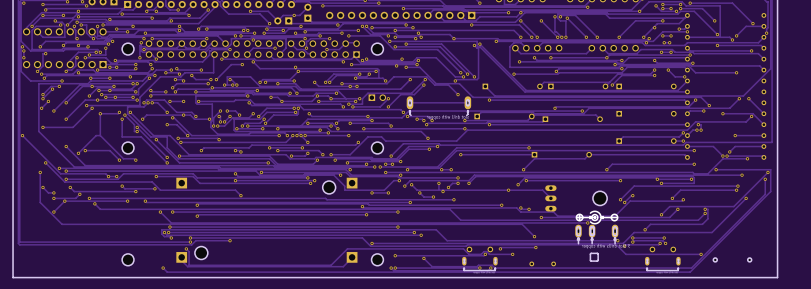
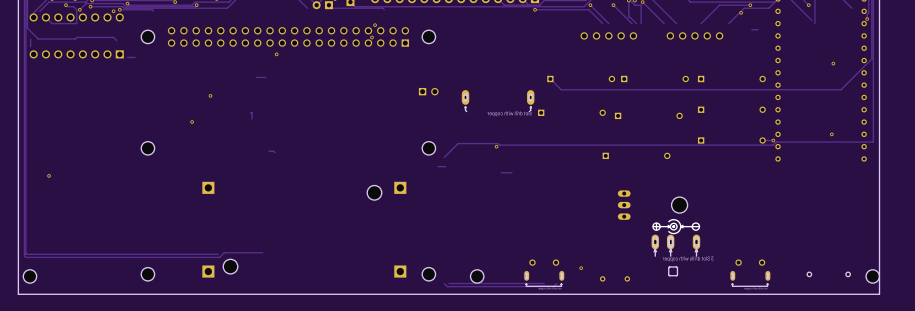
via: (269, 23) -> none
via: (752, 23) -> none
track: (60, 25) (36, 26) (32, 30) (32, 49) (88, 46) -> none
via: (60, 25) -> none
track: (81, 25) (86, 25) (86, 33) (93, 38) -> none
via: (81, 25) -> none
via: (337, 25) -> none
track: (406, 25) (343, 23) (337, 29) (288, 29) (284, 33) (264, 33) -> none
via: (406, 25) -> none
via: (32, 26) -> none
track: (74, 26) (77, 38) -> none
via: (74, 26) -> none
track: (97, 26) (97, 35) (101, 37) (107, 37) (109, 34) (134, 34) (138, 30) (175, 30) (178, 33) (254, 33) -> none
via: (133, 26) -> none
track: (179, 26) (184, 31) (243, 30) -> none
via: (179, 26) -> none
track: (301, 26) (201, 26) (198, 29) -> none
via: (301, 26) -> none
track: (362, 26) (370, 34) (388, 35) -> none
via: (362, 26) -> none
track: (366, 26) (373, 33) (395, 33) (397, 35) (421, 37) -> none
via: (366, 26) -> none
track: (687, 26) (684, 29) (679, 29) -> none
track: (763, 26) (746, 26) (736, 35) -> none
via: (372, 27) -> none
track: (412, 27) (372, 27) -> none
via: (412, 27) -> none
track: (116, 29) (179, 30) -> none
via: (116, 29) -> none
via: (198, 29) -> none
track: (206, 29) (245, 27) (247, 30) -> none
via: (206, 29) -> none
track: (266, 29) (283, 30) -> none
via: (266, 29) -> none
via: (679, 29) -> none
via: (179, 30) -> none
via: (243, 30) -> none
via: (247, 30) -> none
via: (283, 30) -> none
track: (358, 30) (305, 31) -> none
via: (358, 30) -> none
track: (395, 30) (514, 30) (520, 37) -> none
via: (395, 30) -> none
track: (92, 31) (97, 38) (108, 38) (111, 35) (217, 35) (225, 43) -> none
track: (127, 31) (103, 31) -> none
via: (127, 31) -> none
via: (305, 31) -> none
track: (687, 31) (662, 31) (653, 41) (646, 42) (496, 41) -> none
via: (687, 31) -> none
track: (145, 33) (235, 35) -> none
via: (145, 33) -> none
via: (254, 33) -> none
via: (264, 33) -> none
via: (295, 33) -> none
track: (341, 33) (295, 33) -> none
via: (341, 33) -> none
track: (418, 33) (449, 34) (453, 38) (499, 40) (649, 38) -> none
via: (418, 33) -> none
via: (717, 34) -> none
via: (235, 35) -> none
via: (240, 35) -> none
track: (320, 35) (240, 35) -> none
via: (320, 35) -> none
track: (348, 35) (380, 35) (393, 49) (437, 49) (460, 72) -> none
via: (348, 35) -> none
via: (388, 35) -> none
via: (662, 35) -> none
track: (671, 35) (662, 35) -> none
via: (671, 35) -> none
via: (736, 35) -> none
track: (395, 37) (415, 38) -> none
via: (395, 37) -> none
via: (421, 37) -> none
via: (520, 37) -> none
via: (531, 37) -> none
via: (537, 37) -> none
via: (557, 37) -> none
via: (561, 37) -> none
via: (565, 37) -> none
via: (586, 37) -> none
via: (597, 37) -> none
via: (619, 37) -> none
via: (643, 37) -> none
track: (687, 37) (729, 37) (732, 40) -> none
track: (763, 37) (758, 42) (687, 42) (684, 45) (645, 45) (642, 42) (542, 42) (537, 48) -> none
via: (77, 38) -> none
via: (93, 38) -> none
track: (144, 38) (112, 37) (104, 41) (45, 41) (40, 46) -> none
via: (144, 38) -> none
via: (152, 38) -> none
track: (206, 38) (152, 38) -> none
via: (206, 38) -> none
track: (305, 38) (231, 38) (231, 44) (227, 48) (209, 48) (203, 54) -> none
via: (305, 38) -> none
track: (329, 38) (310, 38) (306, 41) (306, 48) -> none
via: (415, 38) -> none
via: (453, 38) -> none
via: (649, 38) -> none
track: (253, 40) (286, 38) (286, 48) (280, 54) -> none
via: (253, 40) -> none
via: (732, 40) -> none
track: (112, 41) (66, 42) (63, 45) -> none
via: (112, 41) -> none
track: (389, 41) (477, 41) (477, 45) (524, 91) (687, 91) -> none
via: (389, 41) -> none
via: (496, 41) -> none
track: (141, 42) (139, 57) -> none
via: (141, 42) -> none
via: (646, 42) -> none
via: (664, 42) -> none
via: (669, 42) -> none
track: (203, 43) (198, 48) (186, 48) (181, 43) (176, 48) (141, 46) (142, 52) (152, 55) (156, 59) -> none
track: (214, 43) (210, 44) (205, 49) (144, 49) -> none
track: (291, 43) (296, 49) (303, 49) (307, 53) (312, 54) -> none
track: (356, 43) (346, 42) (339, 49) (326, 49) -> none
track: (108, 44) (78, 45) -> none
via: (108, 44) -> none
track: (406, 44) (441, 44) (474, 76) -> none
via: (406, 44) -> none
track: (479, 44) (526, 90) (677, 90) (687, 80) -> none
via: (479, 44) -> none
via: (63, 45) -> none
via: (78, 45) -> none
track: (474, 45) (478, 48) (478, 78) (455, 80) -> none
via: (474, 45) -> none
track: (717, 45) (761, 45) (763, 48) -> none
via: (717, 45) -> none
track: (22, 46) (21, 71) (30, 80) (62, 80) -> none
via: (22, 46) -> none
via: (40, 46) -> none
via: (88, 46) -> none
track: (395, 46) (440, 46) (467, 74) -> none
via: (395, 46) -> none
track: (105, 48) (105, 55) (89, 55) -> none
via: (105, 48) -> none
track: (275, 48) (253, 48) (247, 54) -> none
via: (275, 48) -> none
via: (306, 48) -> none
track: (526, 48) (520, 42) (514, 42) (509, 46) (509, 67) (688, 65) (695, 72) (736, 72) -> none
track: (591, 48) (586, 53) (520, 53) (515, 48) -> none
track: (602, 48) (608, 53) (636, 53) (641, 49) (672, 49) (675, 52) (694, 53) (758, 53) (763, 59) -> none
track: (687, 48) (690, 50) (751, 50) -> none
via: (144, 49) -> none
track: (230, 49) (212, 49) (202, 61) (115, 60) -> none
via: (230, 49) -> none
via: (23, 50) -> none
via: (751, 50) -> none
track: (96, 52) (78, 52) (70, 60) (70, 64) -> none
via: (96, 52) -> none
via: (100, 52) -> none
via: (661, 52) -> none
track: (671, 52) (661, 52) -> none
via: (671, 52) -> none
track: (45, 53) (42, 53) (42, 65) (37, 71) -> none
via: (45, 53) -> none
track: (214, 54) (213, 72) (184, 72) (180, 76) (160, 76) (139, 97) (139, 105) (86, 105) -> none
track: (269, 54) (273, 59) (351, 59) (355, 55) (356, 54) (354, 56) (361, 63) (414, 63) (418, 60) -> none
via: (89, 55) -> none
track: (690, 55) (609, 55) (606, 57) (550, 57) -> none
via: (690, 55) -> none
via: (23, 57) -> none
track: (77, 57) (75, 65) (71, 70) (66, 71) -> none
via: (77, 57) -> none
track: (85, 57) (105, 57) (111, 63) (148, 61) (150, 64) -> none
via: (85, 57) -> none
via: (139, 57) -> none
track: (534, 57) (537, 60) (621, 60) -> none
via: (534, 57) -> none
via: (550, 57) -> none
via: (606, 57) -> none
via: (156, 59) -> none
track: (221, 59) (343, 61) -> none
via: (221, 59) -> none
via: (366, 59) -> none
track: (402, 59) (366, 59) -> none
via: (402, 59) -> none
track: (687, 59) (628, 57) (623, 63) (519, 61) -> none
via: (115, 60) -> none
track: (362, 60) (412, 61) (417, 57) (436, 57) (455, 76) (463, 76) -> none
via: (362, 60) -> none
via: (418, 60) -> none
via: (621, 60) -> none
track: (654, 60) (657, 63) (692, 63) -> none
via: (654, 60) -> none
track: (253, 61) (260, 68) (377, 68) (378, 78) -> none
via: (253, 61) -> none
via: (343, 61) -> none
via: (519, 61) -> none
via: (692, 63) -> none
track: (135, 64) (103, 64) -> none
via: (135, 64) -> none
via: (150, 64) -> none
track: (242, 64) (231, 64) (216, 79) -> none
via: (351, 64) -> none
track: (417, 64) (351, 64) -> none
via: (417, 64) -> none
track: (615, 64) (759, 65) (763, 70) -> none
via: (615, 64) -> none
via: (396, 65) -> none
via: (109, 67) -> none
via: (116, 67) -> none
via: (295, 67) -> none
track: (406, 67) (419, 67) (436, 83) (459, 83) (473, 97) (701, 97) (709, 105) -> none
via: (406, 67) -> none
track: (135, 68) (97, 70) -> none
via: (135, 68) -> none
track: (152, 68) (148, 72) (96, 72) (93, 70) (77, 70) (73, 74) (41, 74) -> none
via: (152, 68) -> none
track: (176, 68) (201, 70) -> none
via: (176, 68) -> none
track: (621, 68) (559, 68) (556, 71) -> none
via: (621, 68) -> none
via: (97, 70) -> none
track: (171, 70) (156, 70) (152, 74) (78, 72) -> none
via: (171, 70) -> none
via: (201, 70) -> none
track: (654, 70) (650, 74) (617, 74) (605, 86) -> none
via: (654, 70) -> none
track: (668, 70) (675, 76) (684, 76) -> none
via: (668, 70) -> none
track: (687, 70) (684, 67) (627, 67) (621, 72) (514, 74) -> none
via: (37, 71) -> none
via: (66, 71) -> none
via: (298, 71) -> none
track: (376, 71) (298, 71) (290, 79) (262, 79) (260, 82) -> none
via: (376, 71) -> none
via: (556, 71) -> none
via: (78, 72) -> none
track: (165, 72) (179, 74) -> none
via: (165, 72) -> none
via: (460, 72) -> none
via: (41, 74) -> none
via: (179, 74) -> none
track: (359, 74) (333, 74) (325, 82) -> none
via: (359, 74) -> none
track: (369, 74) (366, 76) (336, 75) (329, 82) -> none
via: (369, 74) -> none
via: (467, 74) -> none
via: (514, 74) -> none
track: (154, 75) (148, 75) (142, 80) (38, 83) (38, 131) (74, 166) (350, 169) -> none
via: (154, 75) -> none
track: (191, 75) (195, 79) (210, 79) -> none
via: (191, 75) -> none
track: (654, 75) (621, 75) (612, 85) -> none
via: (654, 75) -> none
track: (130, 76) (47, 75) (44, 78) -> none
via: (130, 76) -> none
via: (463, 76) -> none
via: (474, 76) -> none
via: (684, 76) -> none
via: (44, 78) -> none
via: (90, 78) -> none
track: (109, 78) (90, 78) -> none
via: (109, 78) -> none
track: (149, 78) (138, 89) (138, 94) (101, 94) -> none
via: (149, 78) -> none
track: (355, 78) (382, 78) (385, 80) -> none
via: (355, 78) -> none
track: (175, 79) (183, 80) -> none
via: (175, 79) -> none
via: (210, 79) -> none
via: (216, 79) -> none
track: (230, 79) (236, 85) -> none
via: (230, 79) -> none
track: (410, 79) (400, 89) (301, 89) (295, 83) (277, 83) -> none
via: (410, 79) -> none
track: (425, 79) (411, 93) (367, 93) (362, 98) (362, 104) (348, 104) -> none
via: (425, 79) -> none
via: (62, 80) -> none
via: (183, 80) -> none
track: (294, 80) (265, 82) -> none
via: (294, 80) -> none
via: (385, 80) -> none
via: (455, 80) -> none
via: (260, 82) -> none
via: (265, 82) -> none
track: (314, 82) (318, 86) (357, 86) -> none
via: (314, 82) -> none
via: (325, 82) -> none
via: (329, 82) -> none
track: (609, 82) (544, 82) (539, 86) -> none
track: (133, 83) (79, 85) (53, 111) -> none
via: (133, 83) -> none
track: (137, 83) (131, 89) (97, 87) (89, 95) -> none
via: (137, 83) -> none
track: (208, 83) (176, 83) (172, 87) -> none
via: (208, 83) -> none
via: (277, 83) -> none
track: (341, 83) (387, 83) (393, 76) (426, 76) (434, 85) (448, 85) (458, 94) -> none
via: (341, 83) -> none
via: (224, 85) -> none
track: (227, 85) (227, 76) (250, 76) (260, 86) (295, 86) (299, 90) (337, 90) (346, 98) -> none
via: (232, 85) -> none
via: (236, 85) -> none
track: (423, 85) (414, 94) (400, 94) (388, 106) -> none
via: (423, 85) -> none
via: (612, 85) -> none
track: (59, 86) (51, 86) (42, 94) -> none
via: (59, 86) -> none
via: (92, 86) -> none
track: (113, 86) (82, 86) (66, 102) -> none
via: (113, 86) -> none
via: (350, 86) -> none
via: (357, 86) -> none
via: (172, 87) -> none
track: (212, 87) (291, 87) (296, 93) -> none
via: (212, 87) -> none
track: (52, 89) (42, 98) -> none
via: (52, 89) -> none
track: (98, 90) (135, 91) -> none
via: (98, 90) -> none
via: (109, 90) -> none
track: (150, 90) (165, 91) -> none
via: (150, 90) -> none
track: (257, 90) (178, 89) (175, 91) -> none
via: (257, 90) -> none
via: (135, 91) -> none
via: (165, 91) -> none
via: (175, 91) -> none
track: (195, 91) (290, 93) -> none
via: (195, 91) -> none
via: (290, 93) -> none
via: (296, 93) -> none
track: (336, 93) (316, 93) (313, 95) (251, 93) (150, 95) -> none
via: (336, 93) -> none
via: (42, 94) -> none
via: (101, 94) -> none
via: (458, 94) -> none
via: (89, 95) -> none
via: (150, 95) -> none
track: (247, 95) (195, 95) (195, 102) (212, 104) (210, 127) (217, 134) (284, 132) (287, 135) -> none
via: (247, 95) -> none
via: (317, 95) -> none
via: (105, 97) -> none
via: (115, 97) -> none
track: (133, 97) (105, 97) -> none
via: (133, 97) -> none
track: (270, 97) (277, 97) (281, 101) (311, 101) (317, 95) (328, 95) (331, 98) (359, 98) -> none
via: (270, 97) -> none
via: (42, 98) -> none
via: (331, 98) -> none
via: (359, 98) -> none
track: (388, 98) (380, 106) (352, 106) -> none
via: (388, 98) -> none
track: (739, 98) (729, 108) (589, 108) (583, 113) (481, 112) (477, 116) -> none
via: (739, 98) -> none
track: (748, 98) (763, 113) -> none
via: (748, 98) -> none
via: (97, 100) -> none
track: (137, 100) (85, 100) (66, 119) -> none
via: (137, 100) -> none
track: (489, 100) (684, 100) (687, 102) -> none
via: (489, 100) -> none
track: (695, 100) (688, 106) (554, 108) -> none
via: (695, 100) -> none
track: (48, 101) (41, 108) -> none
via: (48, 101) -> none
via: (169, 101) -> none
track: (183, 101) (169, 101) -> none
track: (198, 101) (250, 100) (254, 104) (340, 104) (343, 106) -> none
via: (198, 101) -> none
via: (281, 101) -> none
via: (318, 101) -> none
track: (355, 101) (318, 101) -> none
via: (355, 101) -> none
via: (66, 102) -> none
track: (144, 102) (146, 100) (164, 100) (176, 112) (191, 112) (195, 116) -> none
via: (144, 102) -> none
track: (148, 102) (144, 106) (127, 106) (127, 113) (150, 136) (167, 136) (167, 147) (178, 158) (269, 158) (276, 165) (366, 164) -> none
via: (148, 102) -> none
track: (152, 102) (157, 102) (167, 112) -> none
via: (152, 102) -> none
track: (249, 102) (251, 105) (299, 105) (303, 109) (400, 109) (403, 112) -> none
via: (249, 102) -> none
track: (467, 102) (409, 102) -> none
via: (348, 104) -> none
via: (86, 105) -> none
via: (709, 105) -> none
via: (343, 106) -> none
via: (352, 106) -> none
via: (388, 106) -> none
via: (41, 108) -> none
track: (92, 108) (73, 127) (42, 127) -> none
via: (92, 108) -> none
track: (294, 108) (266, 108) (258, 116) -> none
via: (294, 108) -> none
track: (298, 108) (296, 115) (273, 115) (265, 123) -> none
via: (298, 108) -> none
via: (554, 108) -> none
via: (53, 111) -> none
track: (220, 111) (213, 117) (213, 126) -> none
via: (220, 111) -> none
track: (227, 111) (235, 111) (239, 115) -> none
via: (227, 111) -> none
track: (582, 111) (408, 111) (402, 117) (307, 119) (301, 126) -> none
via: (582, 111) -> none
track: (703, 111) (690, 111) (687, 113) -> none
via: (703, 111) -> none
track: (119, 112) (100, 113) (100, 135) -> none
via: (119, 112) -> none
track: (130, 112) (153, 135) (169, 135) (189, 154) (286, 154) (290, 158) (396, 158) (408, 146) (437, 146) -> none
via: (130, 112) -> none
via: (167, 112) -> none
track: (295, 112) (266, 112) (260, 119) (234, 119) (234, 130) (320, 130) -> none
via: (295, 112) -> none
via: (403, 112) -> none
via: (100, 113) -> none
track: (253, 113) (249, 117) (232, 117) (224, 126) (217, 126) -> none
via: (253, 113) -> none
track: (309, 113) (311, 116) (367, 116) -> none
via: (309, 113) -> none
track: (722, 113) (752, 113) (763, 124) -> none
via: (722, 113) -> none
track: (124, 115) (134, 124) (134, 131) (137, 131) -> none
via: (124, 115) -> none
via: (183, 115) -> none
via: (239, 115) -> none
via: (195, 116) -> none
via: (219, 116) -> none
track: (230, 116) (224, 121) -> none
via: (230, 116) -> none
via: (258, 116) -> none
via: (367, 116) -> none
track: (407, 116) (428, 116) (432, 120) -> none
via: (407, 116) -> none
track: (751, 116) (746, 121) (695, 121) (687, 130) (467, 130) (456, 141) (385, 141) (381, 136) (367, 136) (350, 154) (331, 154) -> none
via: (751, 116) -> none
track: (172, 117) (191, 135) (279, 135) -> none
via: (172, 117) -> none
via: (66, 119) -> none
track: (122, 119) (122, 136) (141, 136) (167, 162) -> none
via: (122, 119) -> none
via: (142, 119) -> none
track: (209, 119) (194, 119) (190, 115) (146, 115) (142, 119) -> none
via: (209, 119) -> none
track: (264, 119) (260, 123) (245, 123) (242, 126) -> none
via: (264, 119) -> none
track: (417, 119) (423, 120) -> none
via: (417, 119) -> none
track: (545, 119) (542, 121) (426, 124) -> none
track: (600, 119) (595, 115) (533, 115) (527, 120) (464, 120) -> none
track: (372, 120) (339, 120) (336, 123) -> none
via: (372, 120) -> none
via: (423, 120) -> none
via: (432, 120) -> none
via: (464, 120) -> none
via: (220, 121) -> none
via: (224, 121) -> none
via: (265, 123) -> none
track: (307, 123) (332, 123) (337, 128) -> none
via: (307, 123) -> none
via: (336, 123) -> none
track: (350, 123) (388, 123) (391, 126) -> none
via: (350, 123) -> none
track: (167, 124) (176, 124) (187, 135) -> none
via: (426, 124) -> none
via: (489, 124) -> none
track: (687, 124) (489, 124) -> none
track: (698, 124) (701, 124) (701, 130) -> none
via: (698, 124) -> none
via: (213, 126) -> none
via: (217, 126) -> none
via: (242, 126) -> none
via: (247, 126) -> none
track: (331, 126) (247, 126) -> none
via: (331, 126) -> none
via: (391, 126) -> none
via: (42, 127) -> none
track: (137, 127) (167, 157) -> none
via: (137, 127) -> none
via: (236, 128) -> none
track: (262, 128) (236, 128) -> none
via: (262, 128) -> none
track: (277, 128) (326, 127) (331, 131) (421, 131) (428, 138) -> none
via: (277, 128) -> none
via: (337, 128) -> none
via: (363, 128) -> none
track: (464, 128) (363, 128) -> none
via: (464, 128) -> none
via: (320, 130) -> none
track: (696, 130) (692, 130) (687, 135) -> none
via: (696, 130) -> none
via: (701, 130) -> none
via: (137, 131) -> none
track: (328, 132) (299, 132) (296, 135) -> none
via: (328, 132) -> none
track: (683, 132) (679, 136) (623, 136) (619, 141) -> none
via: (683, 132) -> none
track: (22, 135) (60, 173) (105, 173) (108, 176) (116, 176) -> none
via: (22, 135) -> none
track: (100, 135) (123, 158) (135, 160) -> none
track: (100, 135) (96, 135) (78, 153) -> none
via: (187, 135) -> none
via: (279, 135) -> none
via: (287, 135) -> none
track: (292, 135) (286, 142) (180, 142) -> none
via: (292, 135) -> none
via: (296, 135) -> none
track: (301, 135) (307, 142) -> none
via: (301, 135) -> none
via: (305, 135) -> none
track: (348, 135) (305, 135) -> none
via: (348, 135) -> none
track: (763, 135) (735, 135) -> none
track: (178, 138) (219, 139) -> none
via: (178, 138) -> none
via: (428, 138) -> none
track: (156, 139) (179, 162) (268, 162) -> none
via: (156, 139) -> none
via: (219, 139) -> none
via: (180, 142) -> none
via: (307, 142) -> none
track: (358, 142) (355, 145) (251, 145) (249, 147) (204, 147) (201, 150) -> none
via: (358, 142) -> none
track: (66, 146) (85, 165) (374, 166) -> none
via: (66, 146) -> none
track: (687, 146) (713, 146) (722, 156) -> none
track: (763, 146) (735, 146) (729, 151) -> none
via: (269, 147) -> none
track: (302, 147) (269, 147) -> none
via: (302, 147) -> none
track: (529, 147) (456, 147) (437, 166) (380, 166) -> none
via: (529, 147) -> none
track: (429, 149) (408, 149) (397, 160) (335, 160) -> none
via: (429, 149) -> none
track: (85, 150) (109, 150) (119, 160) -> none
via: (85, 150) -> none
via: (201, 150) -> none
via: (235, 150) -> none
track: (277, 150) (318, 150) (322, 154) -> none
via: (277, 150) -> none
track: (694, 150) (456, 150) (438, 168) (407, 169) -> none
via: (694, 150) -> none
via: (240, 151) -> none
via: (729, 151) -> none
via: (78, 153) -> none
track: (307, 153) (305, 156) (291, 156) -> none
via: (307, 153) -> none
via: (322, 154) -> none
via: (331, 154) -> none
via: (460, 154) -> none
track: (534, 154) (460, 154) -> none
track: (179, 156) (269, 156) (277, 164) (313, 164) (317, 160) -> none
via: (179, 156) -> none
via: (291, 156) -> none
via: (391, 156) -> none
via: (722, 156) -> none
track: (727, 156) (763, 157) -> none
via: (727, 156) -> none
via: (167, 157) -> none
track: (687, 157) (684, 154) (589, 154) (585, 158) (534, 158) (523, 169) -> none
track: (747, 158) (722, 158) (707, 173) (385, 172) -> none
via: (747, 158) -> none
via: (119, 160) -> none
via: (135, 160) -> none
via: (317, 160) -> none
via: (335, 160) -> none
track: (400, 161) (347, 162) -> none
via: (400, 161) -> none
track: (45, 162) (64, 182) (152, 182) (160, 190) (235, 190) (240, 195) -> none
via: (45, 162) -> none
via: (167, 162) -> none
via: (268, 162) -> none
via: (347, 162) -> none
via: (366, 164) -> none
via: (385, 164) -> none
via: (392, 164) -> none
track: (694, 164) (612, 164) (606, 169) -> none
via: (694, 164) -> none
via: (374, 166) -> none
via: (380, 166) -> none
track: (59, 168) (346, 169) (351, 175) (400, 175) -> none
via: (59, 168) -> none
via: (350, 169) -> none
via: (407, 169) -> none
via: (441, 169) -> none
via: (451, 169) -> none
via: (523, 169) -> none
via: (606, 169) -> none
track: (716, 169) (770, 169) (770, 191) (690, 272) (167, 272) (163, 268) -> none
via: (716, 169) -> none
track: (66, 171) (255, 171) (260, 175) (340, 175) -> none
via: (66, 171) -> none
track: (40, 172) (40, 202) (62, 224) (522, 224) (534, 236) -> none
track: (261, 172) (346, 172) (350, 176) (458, 177) -> none
via: (261, 172) -> none
via: (385, 172) -> none
track: (767, 172) (733, 206) (669, 206) (661, 214) -> none
via: (767, 172) -> none
track: (235, 173) (238, 176) (333, 175) (344, 186) (344, 190) (384, 190) (393, 180) (399, 180) -> none
via: (235, 173) -> none
via: (340, 175) -> none
via: (400, 175) -> none
track: (742, 175) (474, 175) (468, 180) (410, 180) (404, 186) -> none
via: (742, 175) -> none
via: (108, 176) -> none
via: (116, 176) -> none
track: (156, 176) (193, 176) (199, 183) (310, 183) -> none
via: (156, 176) -> none
track: (307, 177) (197, 177) (193, 173) (123, 173) (118, 179) (66, 179) -> none
via: (307, 177) -> none
via: (458, 177) -> none
via: (66, 179) -> none
via: (657, 179) -> none
track: (691, 179) (524, 177) (518, 184) -> none
via: (691, 179) -> none
track: (765, 179) (765, 194) (691, 268) (494, 268) (492, 265) (432, 266) (423, 258) -> none
via: (765, 179) -> none
via: (235, 180) -> none
track: (314, 180) (235, 180) -> none
via: (314, 180) -> none
via: (399, 180) -> none
via: (526, 180) -> none
track: (620, 180) (526, 180) -> none
via: (620, 180) -> none
via: (310, 183) -> none
track: (438, 183) (438, 190) -> none
via: (438, 183) -> none
track: (458, 183) (452, 183) (448, 187) -> none
via: (458, 183) -> none
via: (468, 183) -> none
track: (661, 183) (694, 183) (694, 177) (475, 176) (468, 183) -> none
via: (661, 183) -> none
track: (411, 184) (417, 190) (542, 190) (550, 198) -> none
via: (411, 184) -> none
via: (518, 184) -> none
track: (122, 186) (124, 188) (154, 188) -> none
via: (122, 186) -> none
via: (404, 186) -> none
track: (737, 186) (634, 186) (620, 199) -> none
via: (737, 186) -> none
track: (42, 187) (48, 192) (53, 192) -> none
via: (42, 187) -> none
track: (70, 187) (74, 191) (135, 191) -> none
via: (70, 187) -> none
via: (448, 187) -> none
via: (154, 188) -> none
via: (508, 190) -> none
track: (736, 190) (680, 190) (672, 198) -> none
via: (736, 190) -> none
via: (135, 191) -> none
via: (443, 191) -> none
via: (53, 192) -> none
via: (372, 192) -> none
track: (388, 192) (372, 192) -> none
via: (388, 192) -> none
track: (419, 192) (423, 197) (433, 197) -> none
via: (419, 192) -> none
track: (79, 194) (75, 198) (53, 198) -> none
via: (79, 194) -> none
via: (240, 195) -> none
track: (632, 195) (624, 202) -> none
via: (632, 195) -> none
via: (433, 197) -> none
via: (53, 198) -> none
track: (89, 198) (453, 199) -> none
via: (89, 198) -> none
via: (672, 198) -> none
track: (746, 198) (712, 232) (634, 232) (623, 243) (372, 243) -> none
via: (746, 198) -> none
via: (453, 199) -> none
via: (620, 199) -> none
track: (683, 199) (630, 201) (615, 216) (557, 216) (550, 208) -> none
via: (683, 199) -> none
via: (64, 201) -> none
track: (127, 201) (64, 201) (53, 212) -> none
via: (127, 201) -> none
track: (145, 201) (410, 202) -> none
via: (145, 201) -> none
via: (410, 202) -> none
via: (624, 202) -> none
track: (94, 203) (100, 209) (449, 209) (460, 220) (698, 220) (705, 213) -> none
via: (94, 203) -> none
via: (197, 205) -> none
track: (501, 205) (197, 205) -> none
via: (501, 205) -> none
track: (362, 206) (516, 207) (520, 212) (553, 212) -> none
via: (362, 206) -> none
track: (520, 207) (529, 209) -> none
via: (520, 207) -> none
via: (529, 209) -> none
track: (677, 209) (669, 217) (541, 217) -> none
via: (677, 209) -> none
track: (705, 209) (707, 209) (707, 218) (702, 224) (650, 224) (645, 229) -> none
via: (705, 209) -> none
via: (53, 212) -> none
track: (160, 212) (171, 222) (587, 222) -> none
via: (160, 212) -> none
via: (172, 212) -> none
track: (397, 212) (172, 212) -> none
via: (397, 212) -> none
via: (705, 213) -> none
track: (366, 214) (197, 216) -> none
via: (366, 214) -> none
via: (661, 214) -> none
via: (197, 216) -> none
via: (541, 217) -> none
via: (587, 222) -> none
via: (169, 227) -> none
track: (397, 227) (169, 227) -> none
via: (397, 227) -> none
via: (645, 229) -> none
track: (164, 232) (167, 235) (421, 235) -> none
via: (164, 232) -> none
via: (168, 232) -> none
track: (414, 232) (168, 232) -> none
via: (414, 232) -> none
via: (421, 235) -> none
via: (534, 236) -> none
track: (171, 237) (164, 236) (161, 233) (161, 229) (436, 229) (447, 240) (617, 240) -> none
via: (171, 237) -> none
track: (190, 237) (362, 237) (370, 246) (616, 244) (625, 254) (701, 254) -> none
via: (190, 237) -> none
via: (632, 237) -> none
track: (664, 237) (632, 237) -> none
via: (664, 237) -> none
via: (230, 240) -> none
via: (617, 240) -> none
via: (190, 242) -> none
track: (632, 242) (662, 240) (665, 243) -> none
via: (632, 242) -> none
via: (372, 243) -> none
track: (660, 243) (624, 246) -> none
via: (660, 243) -> none
via: (665, 243) -> none
via: (624, 246) -> none
track: (535, 247) (500, 248) -> none
via: (535, 247) -> none
track: (186, 248) (189, 251) (189, 265) (331, 265) (347, 248) (463, 248) (468, 254) (481, 254) (483, 251) (489, 254) (512, 254) -> none
via: (186, 248) -> none
via: (500, 248) -> none
track: (485, 254) (395, 255) -> none
via: (485, 254) -> none
via: (701, 254) -> none
via: (395, 255) -> none
track: (352, 257) (343, 266) (187, 266) (182, 261) (181, 257) -> none
via: (423, 258) -> none
hole: none -> (29, 276)
hole: none -> (477, 276)
hole: none -> (872, 276)
via: (163, 268) -> none
via: (391, 268) -> none
via: (395, 268) -> none
via: (479, 268) -> none
via: (490, 268) -> none

